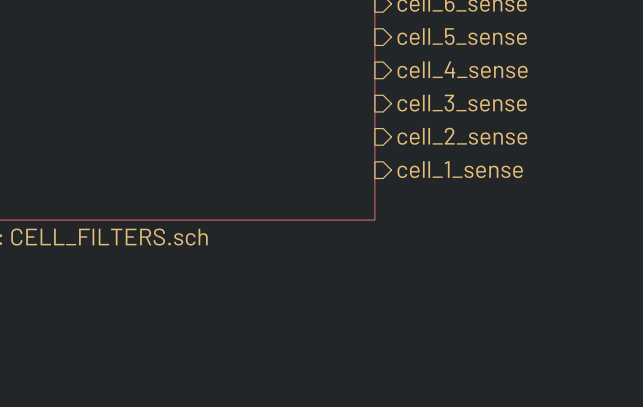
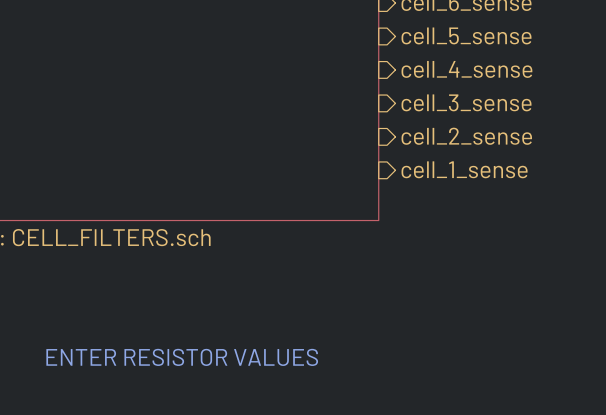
text: none -> ENTER RESISTOR VALUES (182, 357)

